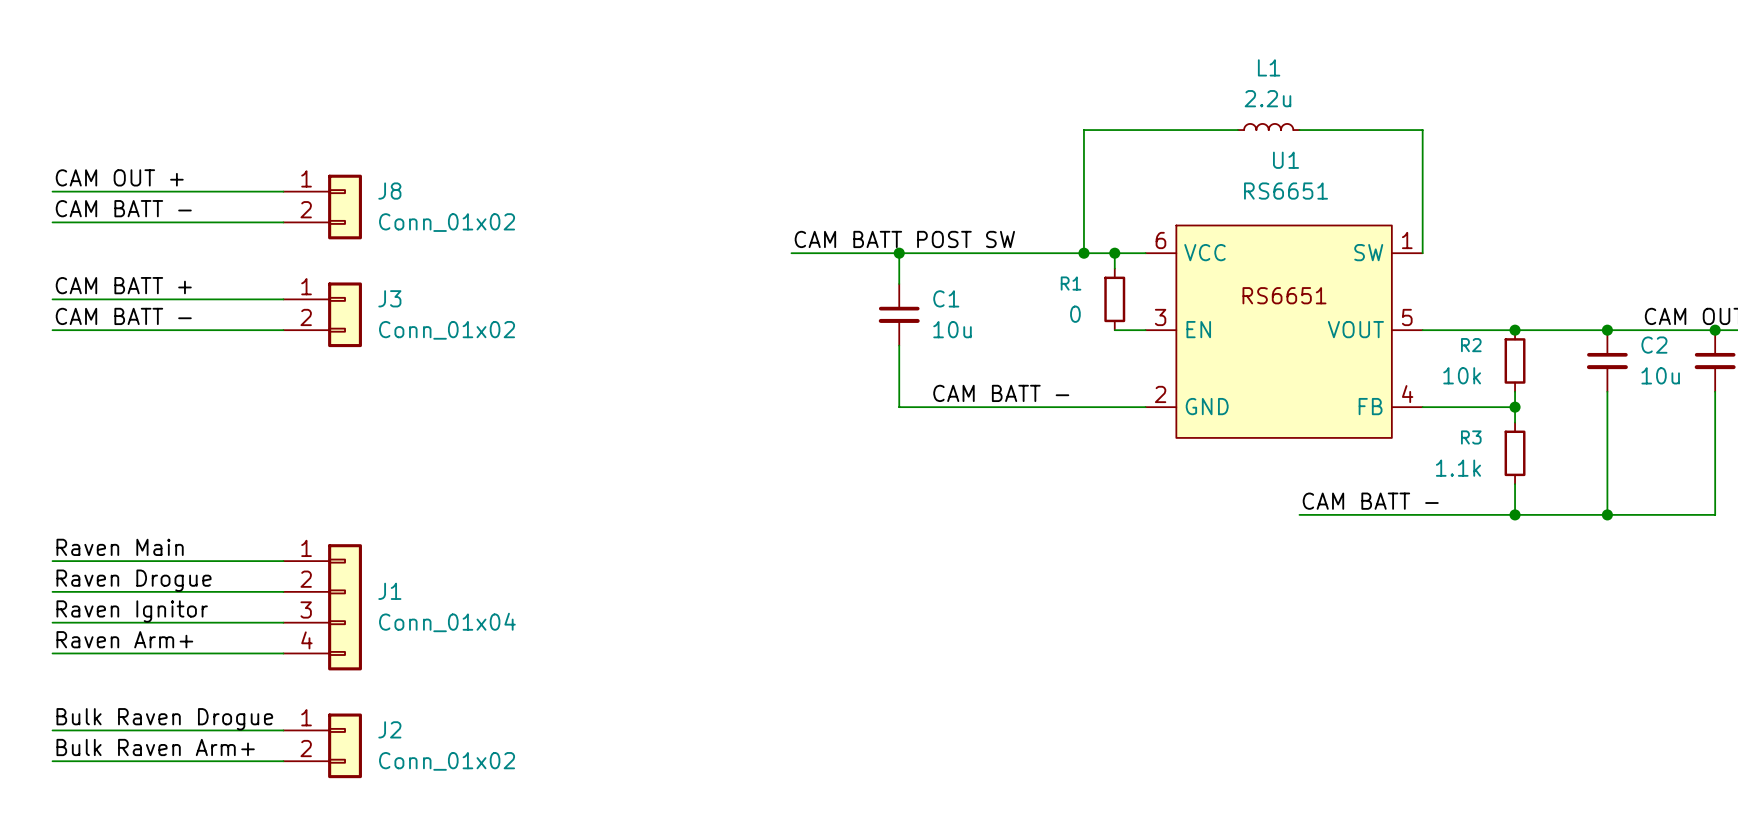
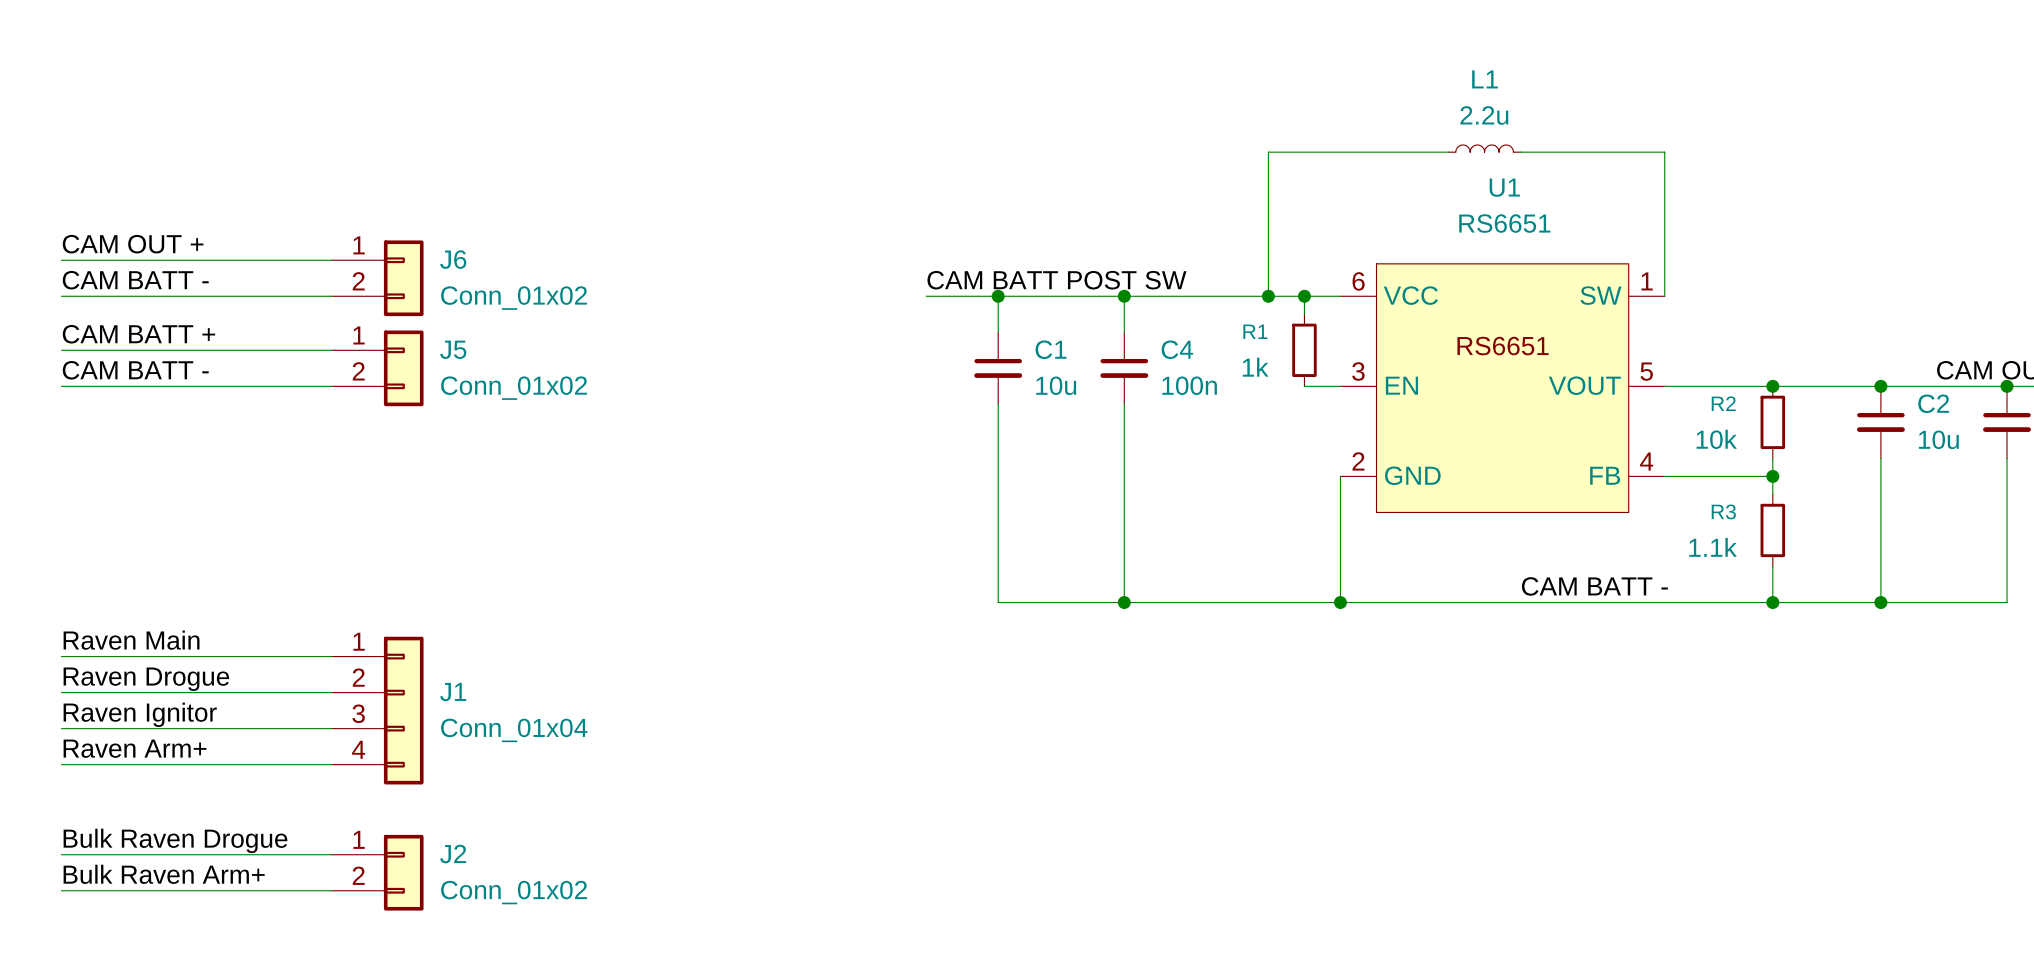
label: CAM OUT + (119, 177) -> none
wire: (52, 191) (283, 191) -> (61, 296) (331, 296)
J8: Conn_01x02 (322, 207) -> none
label: CAM BATT - (123, 208) -> CAM OUT + (133, 244)
J6: none -> Conn_01x02 (377, 278)
label: none -> CAM BATT - (135, 280)
junction: none -> (998, 296)
wire: (899, 253) (899, 283) -> (998, 296) (998, 332)
junction: (899, 253) -> none
wire: none -> (1124, 296) (1124, 332)
junction: none -> (1124, 296)
J3 name: J3 (389, 298) -> J5 (453, 349)
C1 position: (899, 314) -> (998, 368)
C4: none -> 100n (1124, 368)
R1 value: 0 (1075, 314) -> 1k (1255, 367)
wire: none -> (998, 404) (998, 602) (1520, 602)
wire: (899, 345) (899, 407) (1145, 407) -> (1340, 602) (1340, 476)
wire: none -> (1124, 404) (1124, 602)
label: CAM BATT - (1001, 393) -> none
junction: none -> (1124, 602)
junction: none -> (1340, 602)

